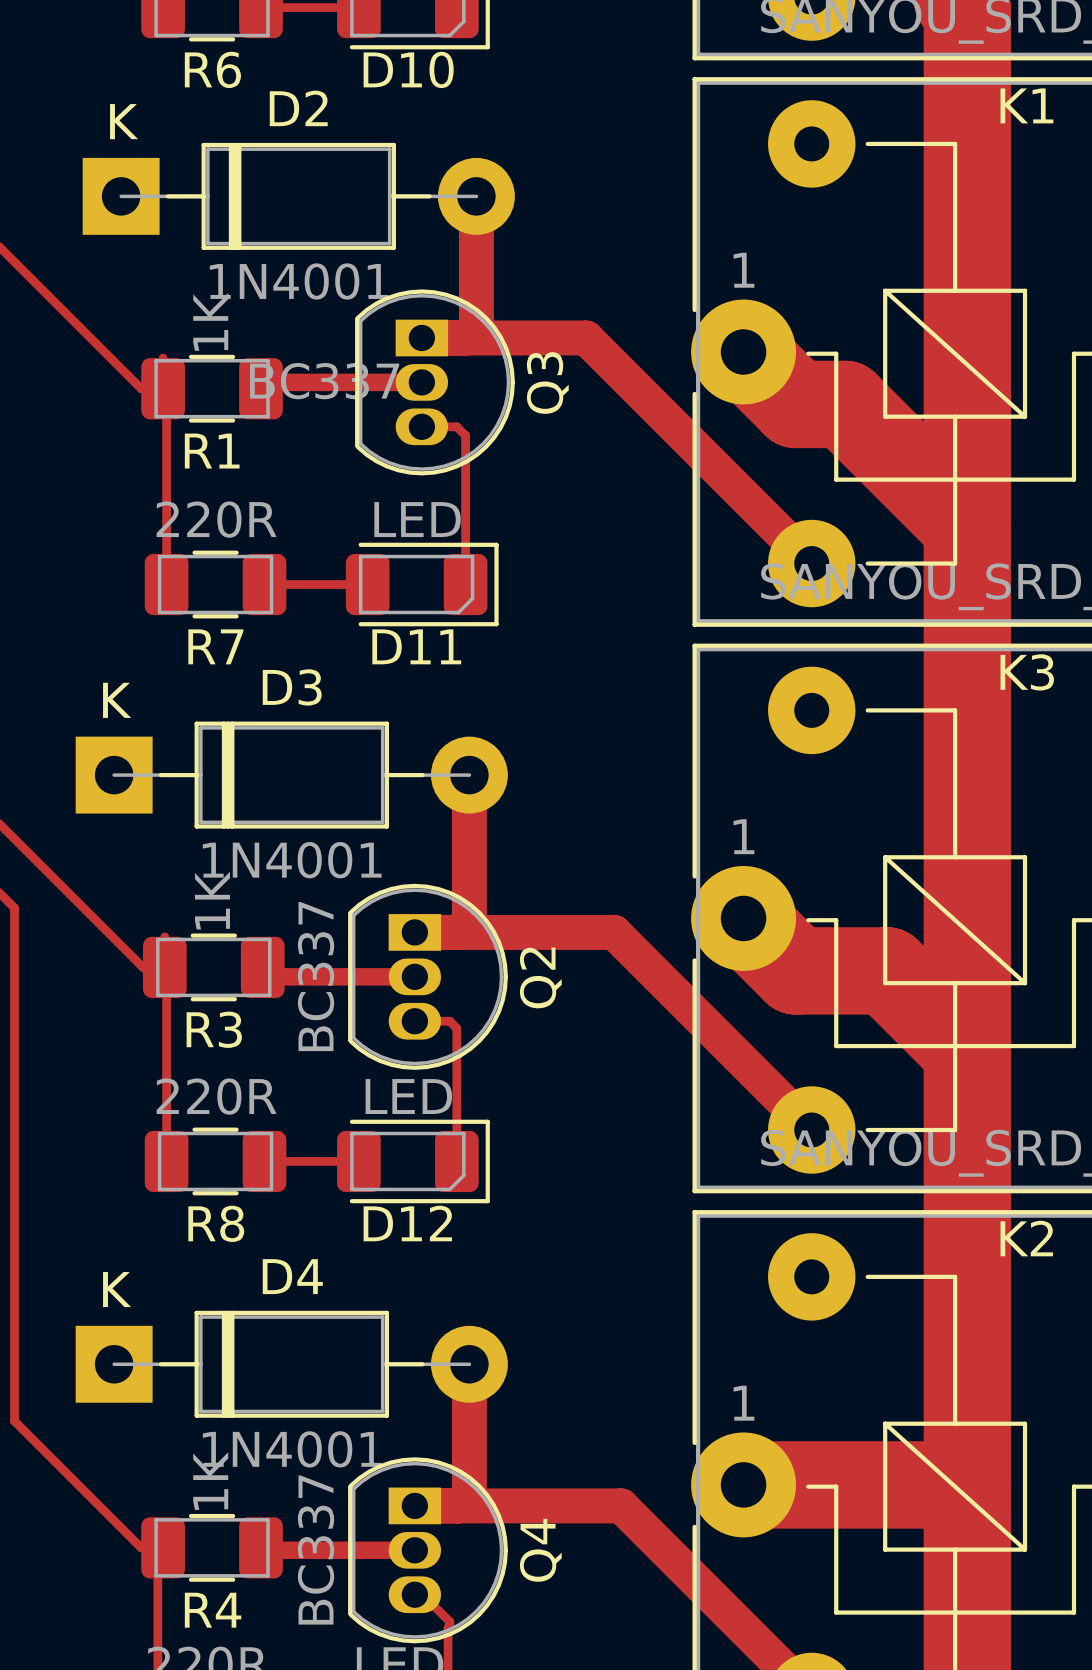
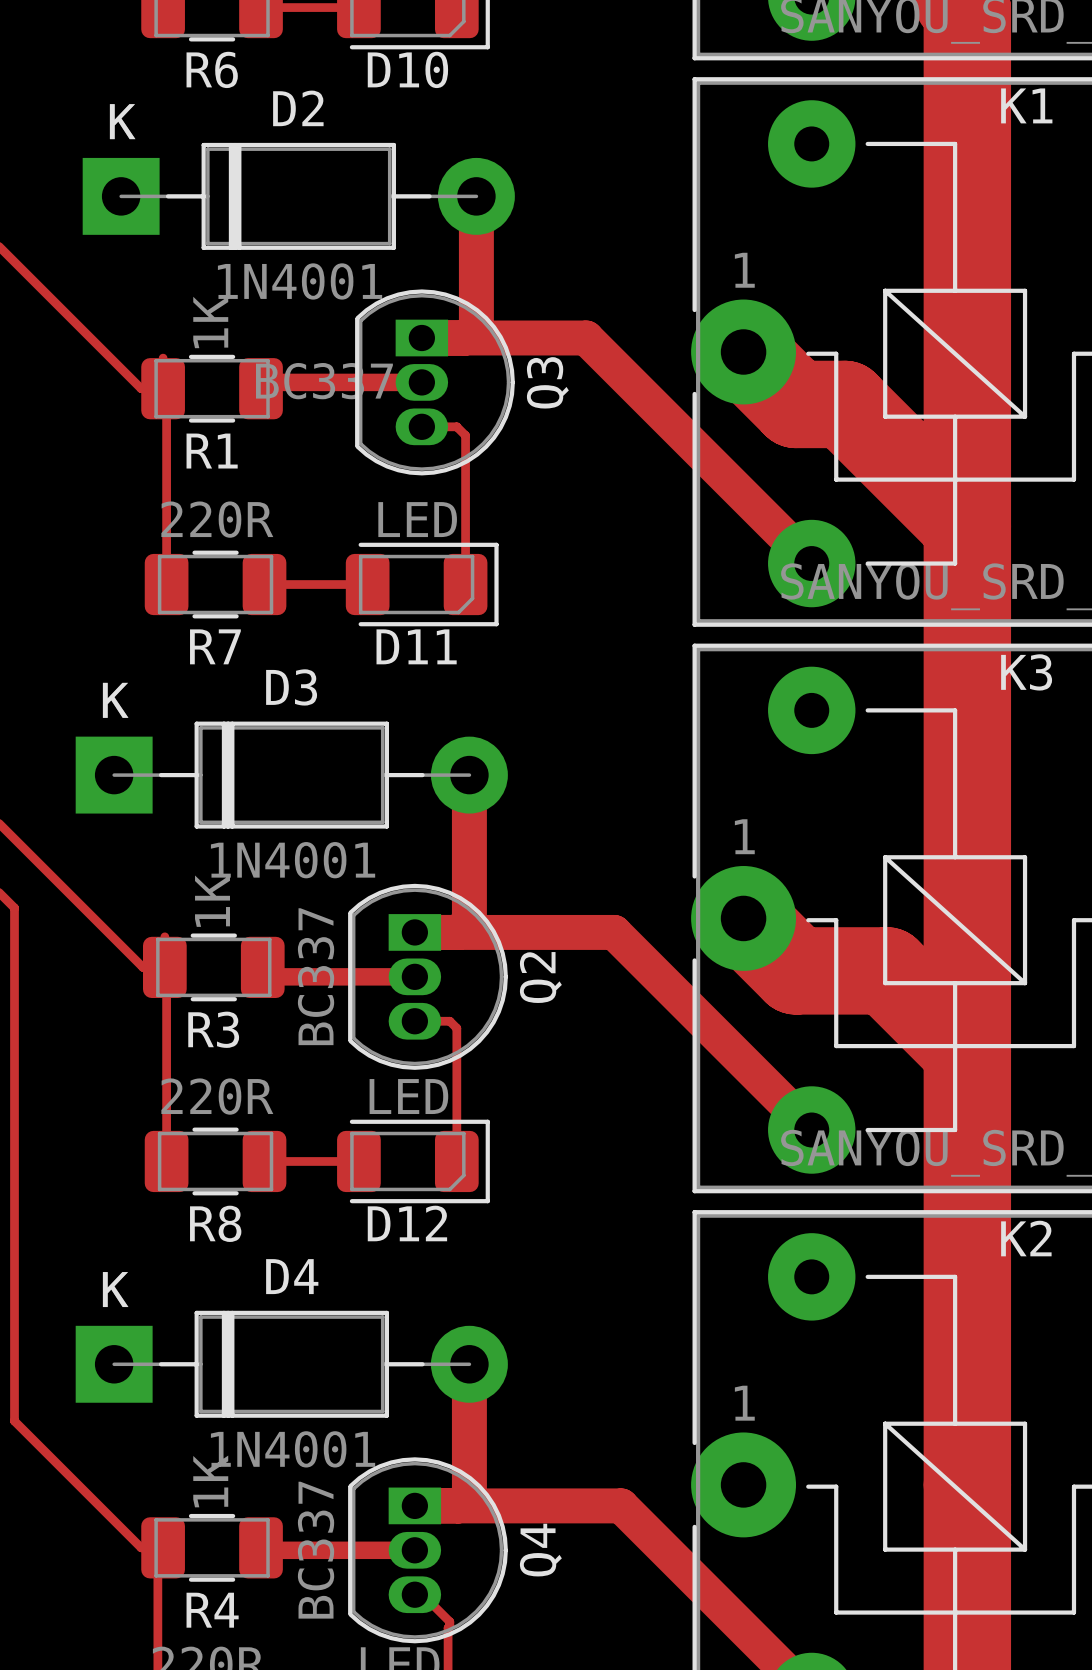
track: (743, 1484) (967, 1484) -> none

